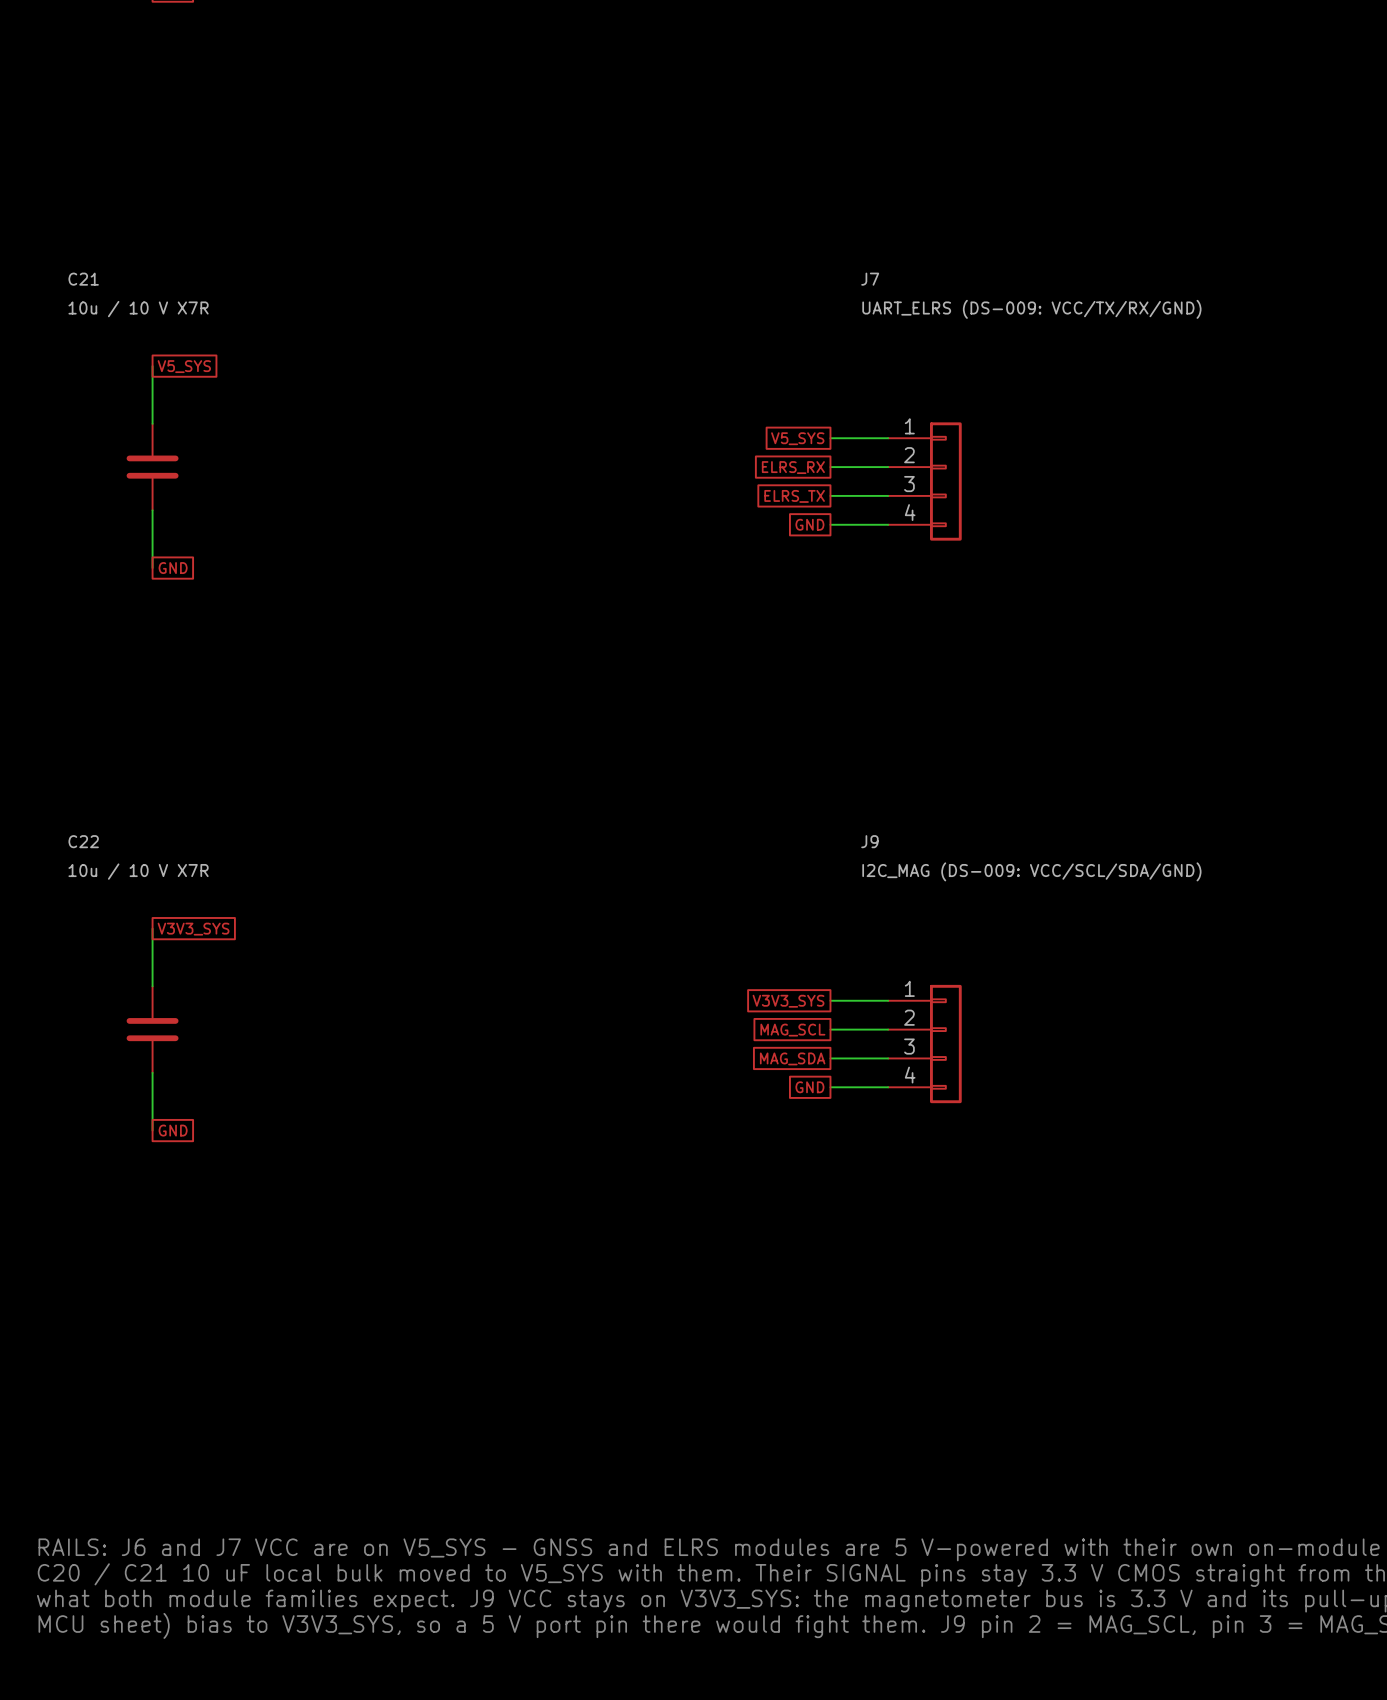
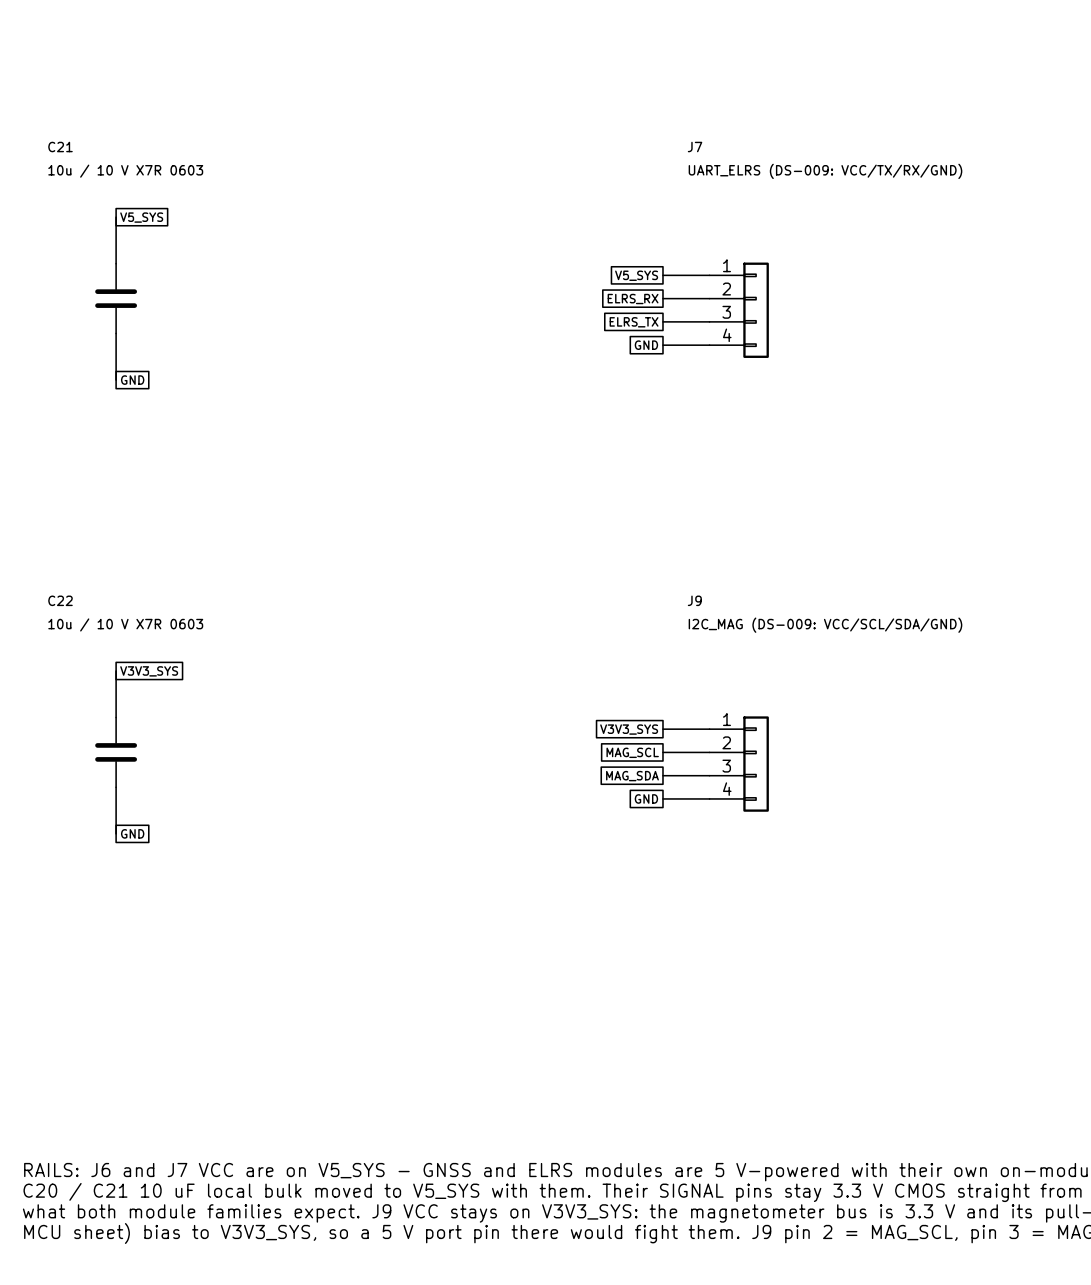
C21 value: 10u / 10 V X7R (138, 309) -> 10u / 10 V X7R 0603 (125, 171)
C22 value: 10u / 10 V X7R (138, 871) -> 10u / 10 V X7R 0603 (125, 624)

